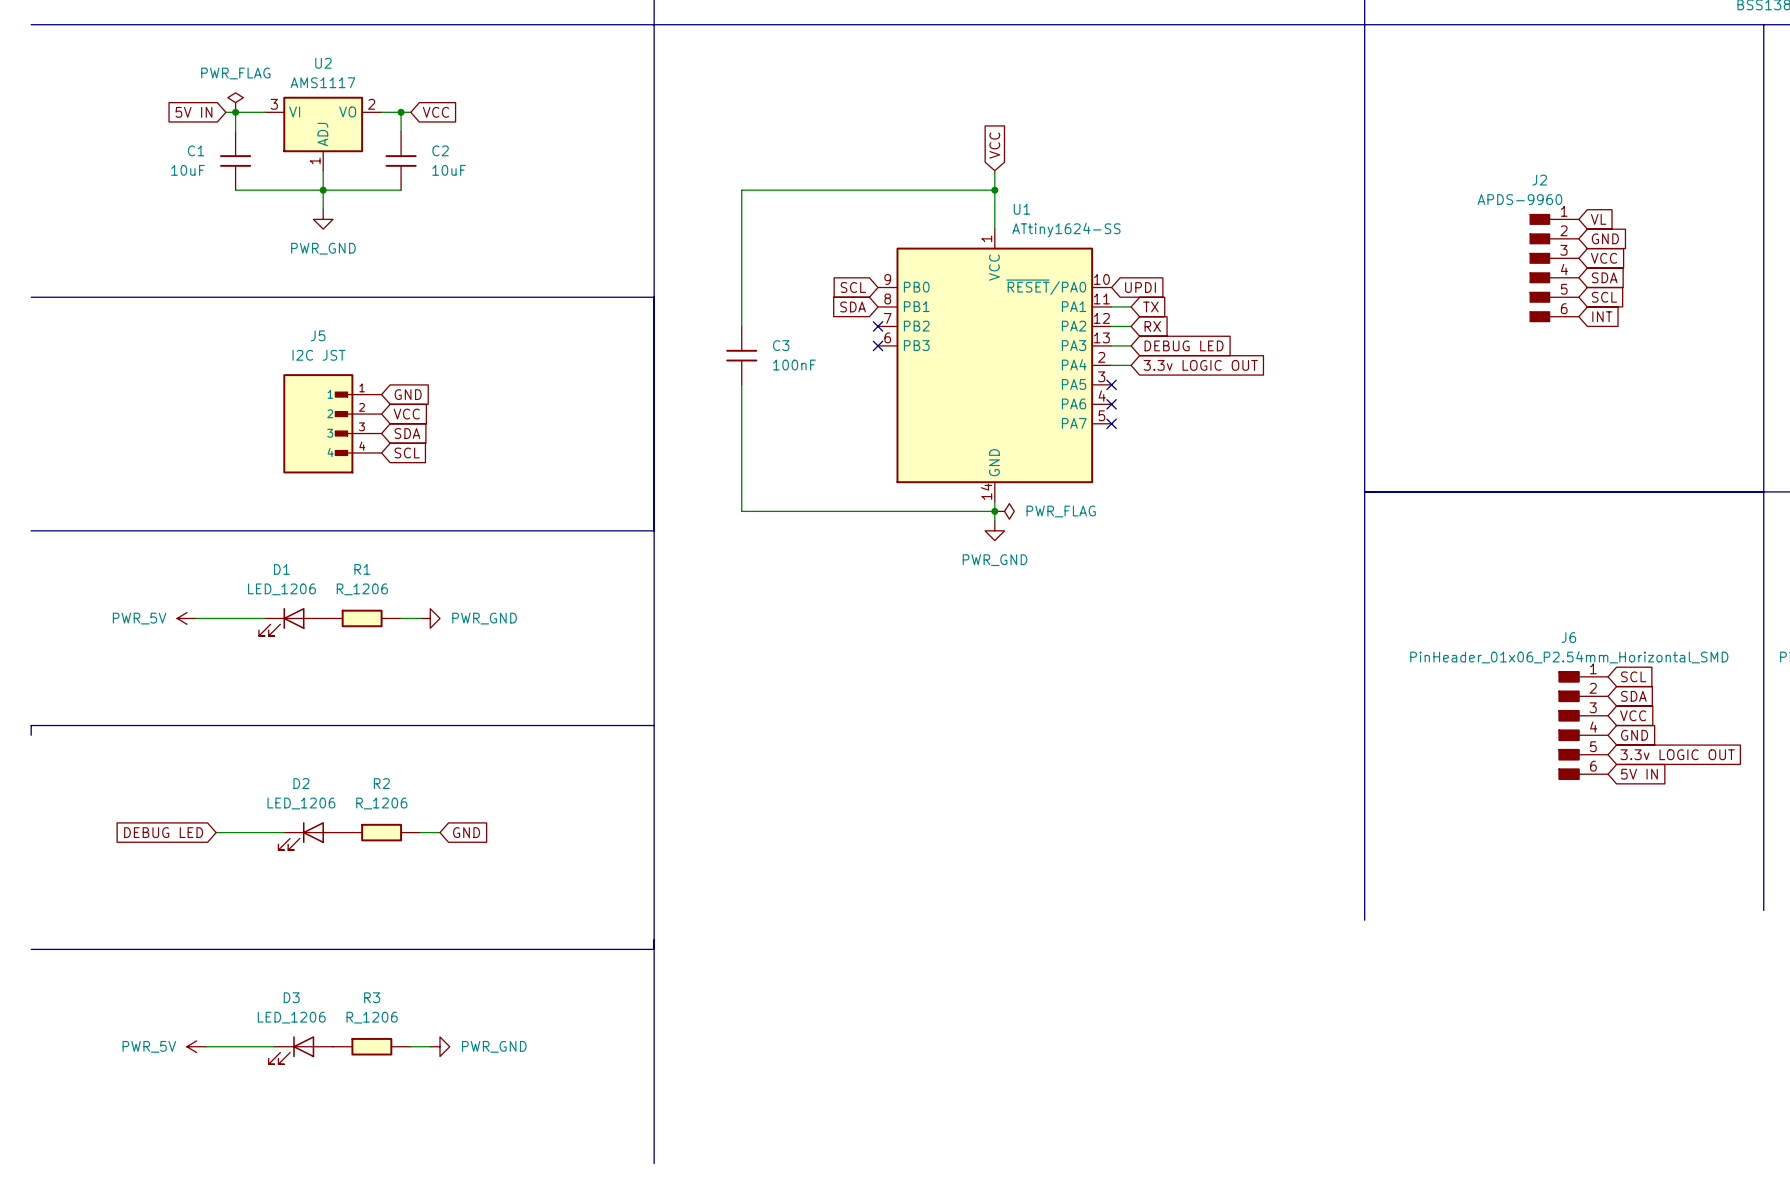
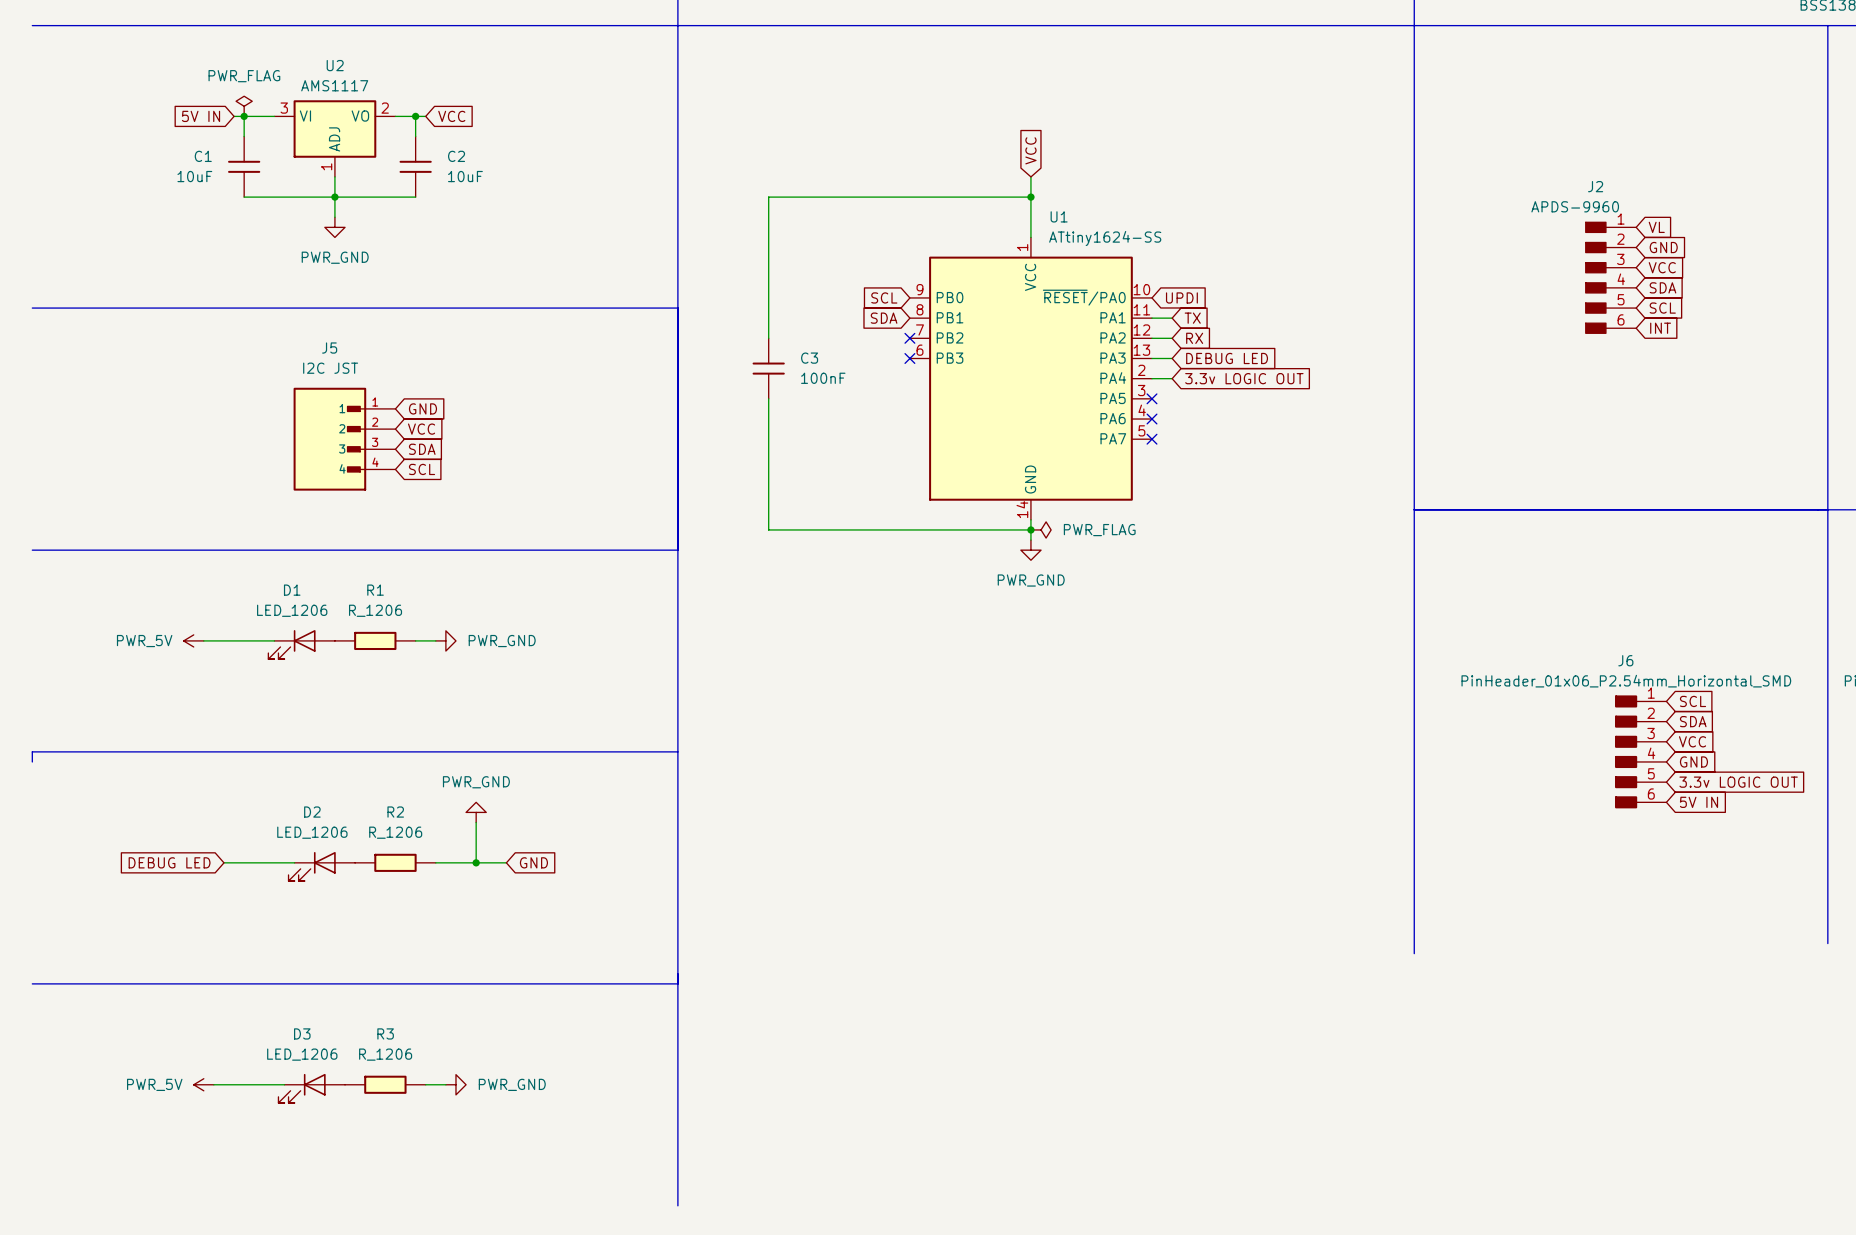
power symbol: none -> PWR_GND (476, 812)
wire: none -> (476, 822) (476, 862)
wire: none -> (455, 862) (506, 862)
junction: none -> (476, 862)
global label position: GND (466, 832) -> GND (533, 862)

